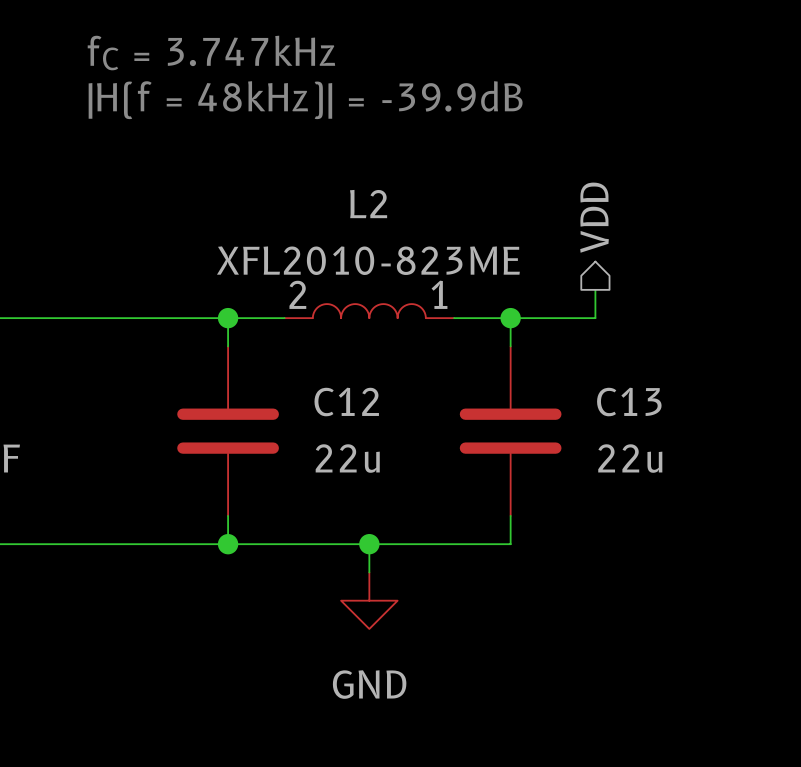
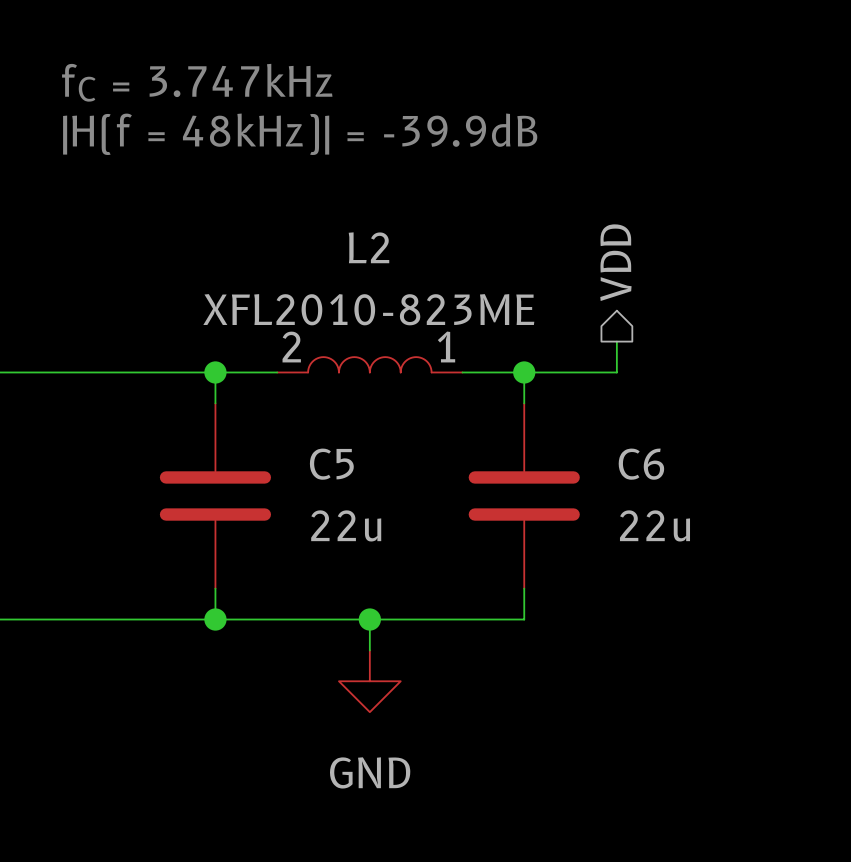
C12 name: C12 (346, 401) -> C5 (331, 464)
C13 name: C13 (629, 401) -> C6 (641, 464)

